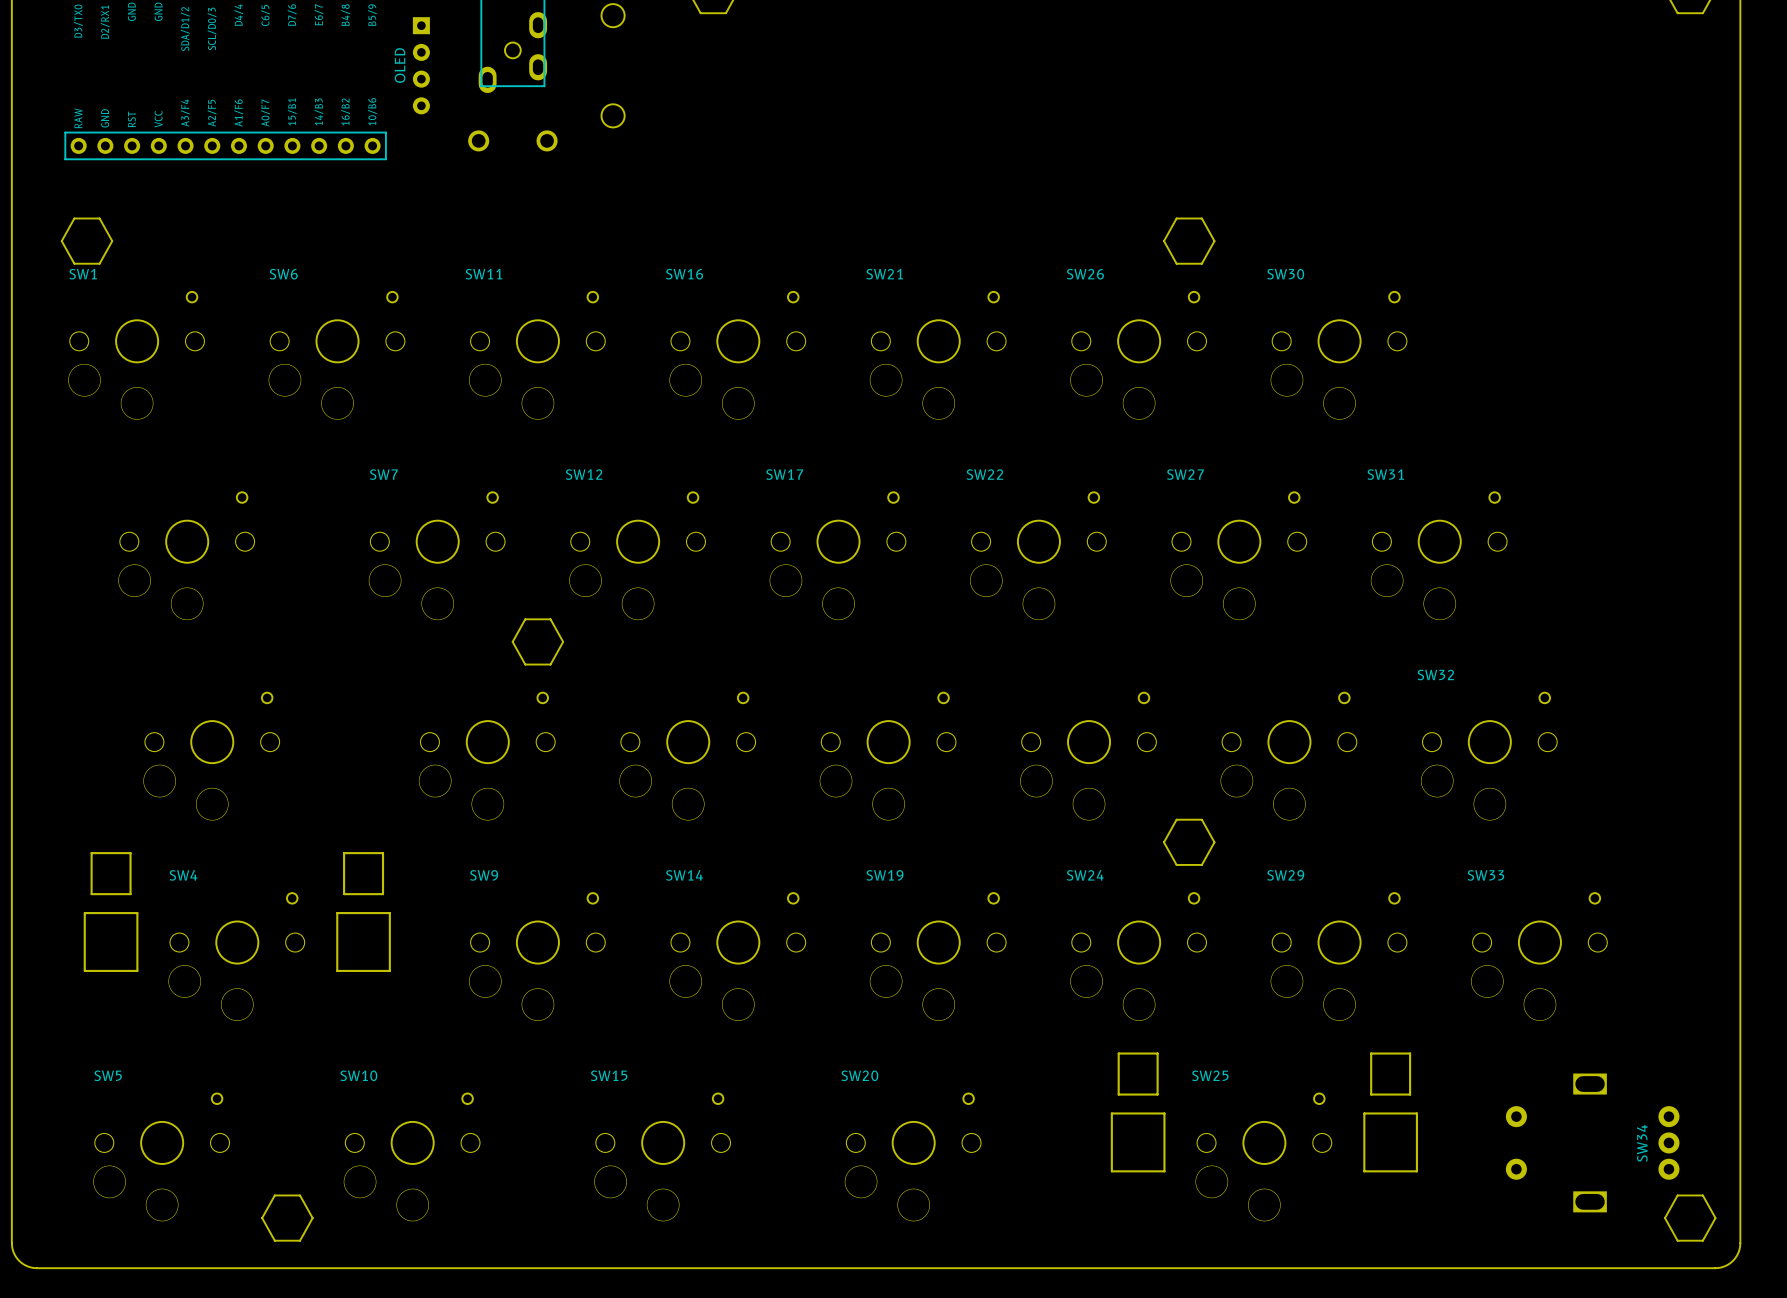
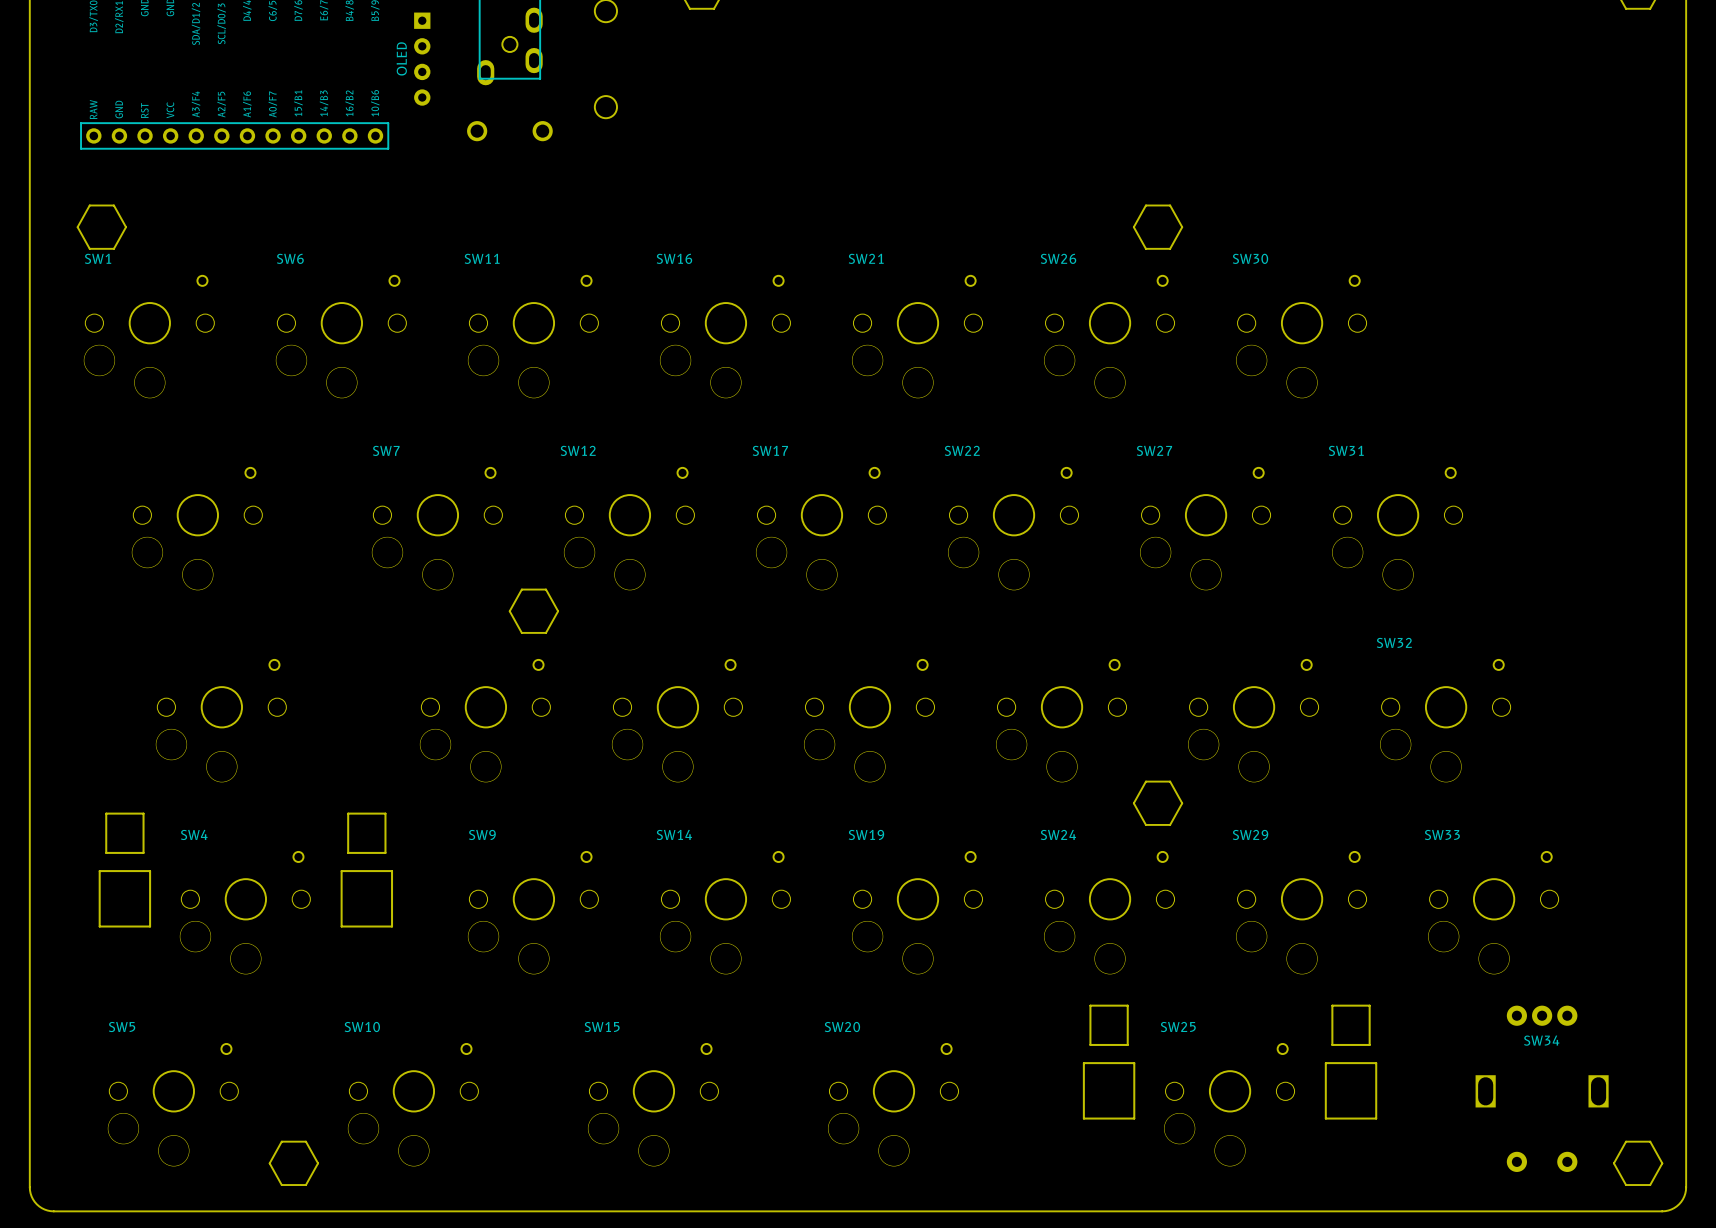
SW34 rotation: 0° (1592, 1142) -> 90° counterclockwise (1542, 1088)

